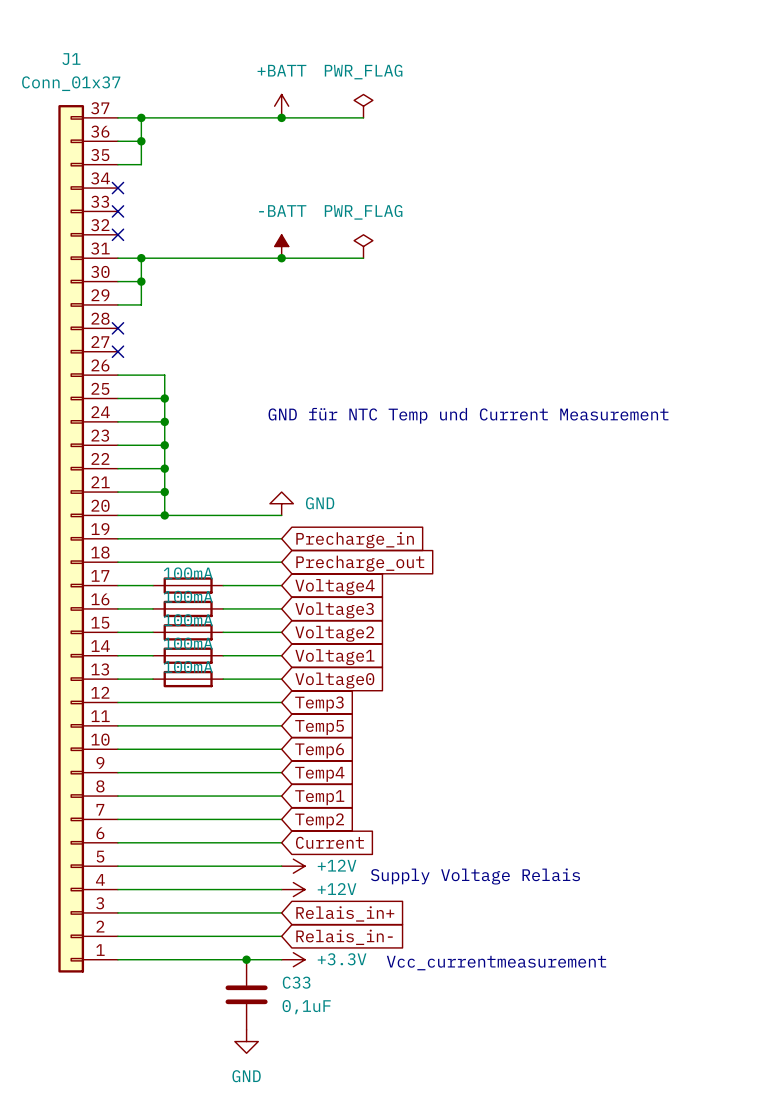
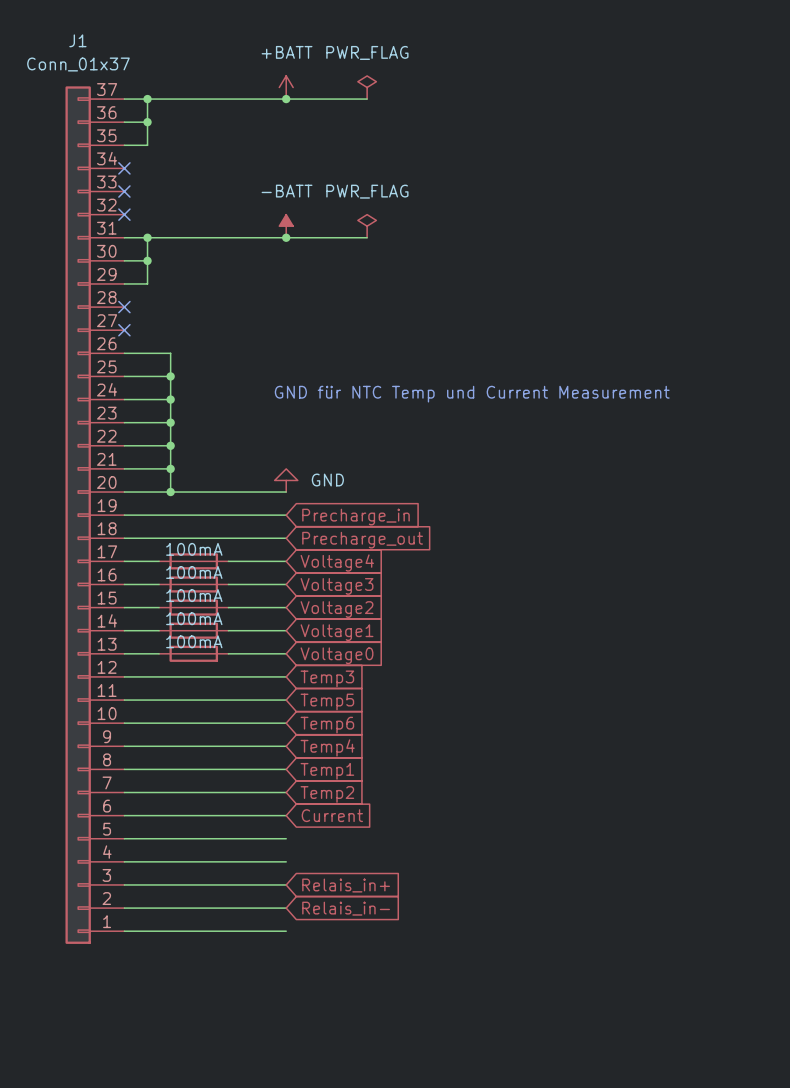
power symbol: +12V (293, 866) -> none
text: Supply Voltage Relais (475, 876) -> none
power symbol: +12V (293, 889) -> none
junction: (246, 959) -> none
power symbol: +3.3V (293, 959) -> none
text: Vcc_currentmeasurement (496, 963) -> none
C33: 0,1uF (246, 994) -> none
power symbol: GND (246, 1041) -> none

